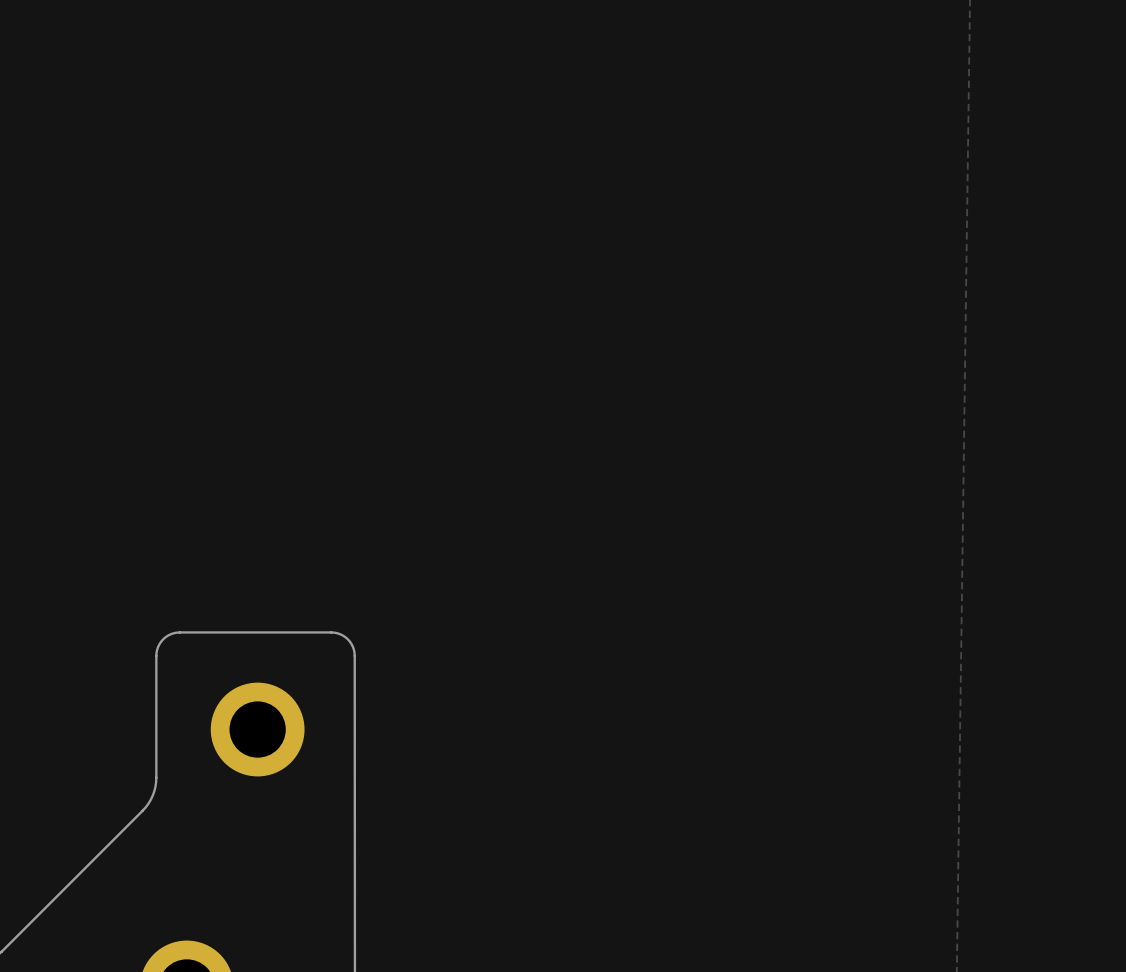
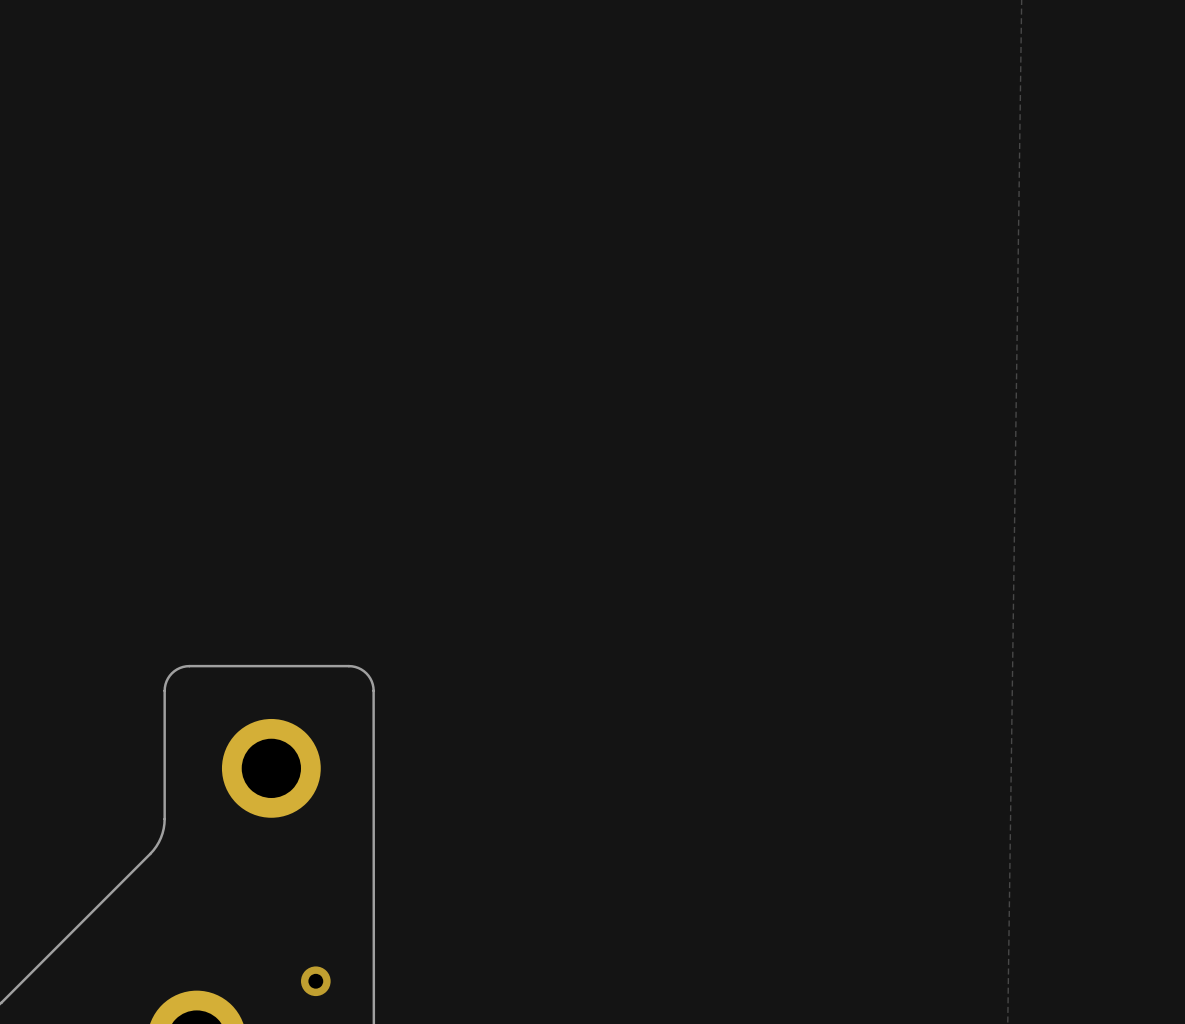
via: none -> (315, 981)

